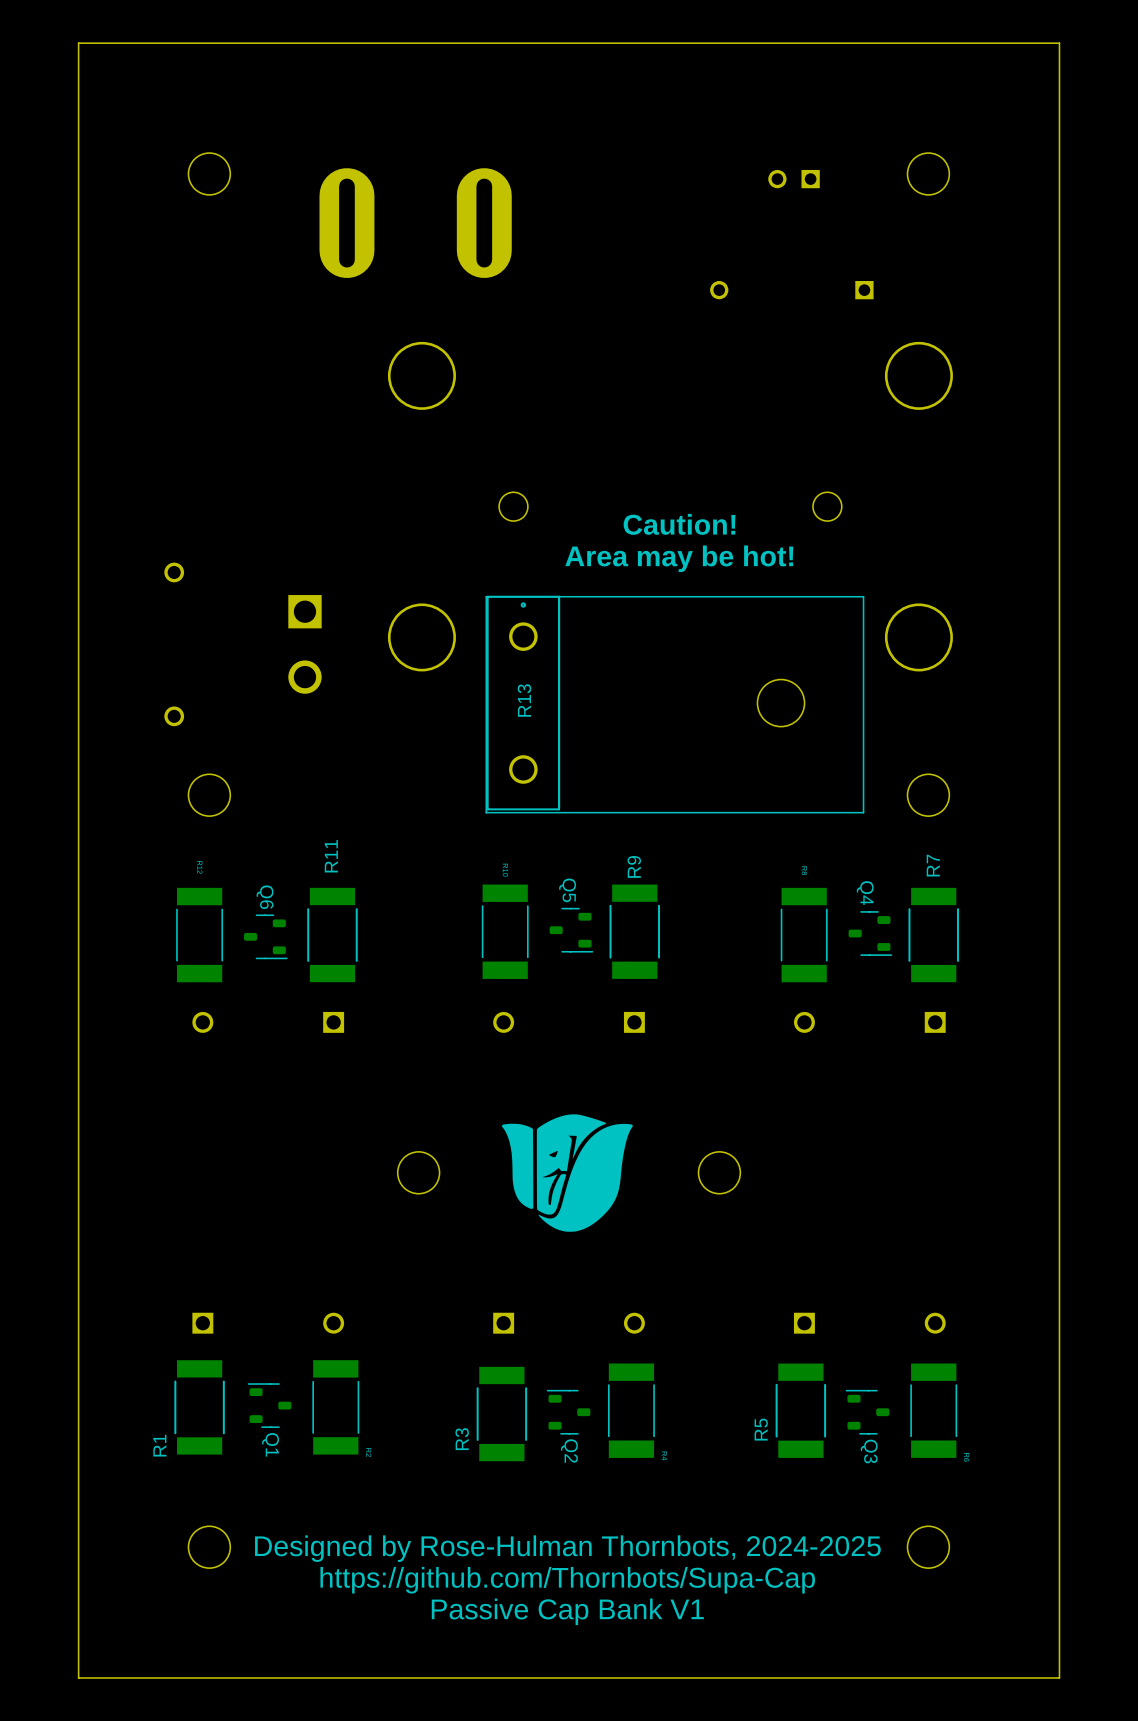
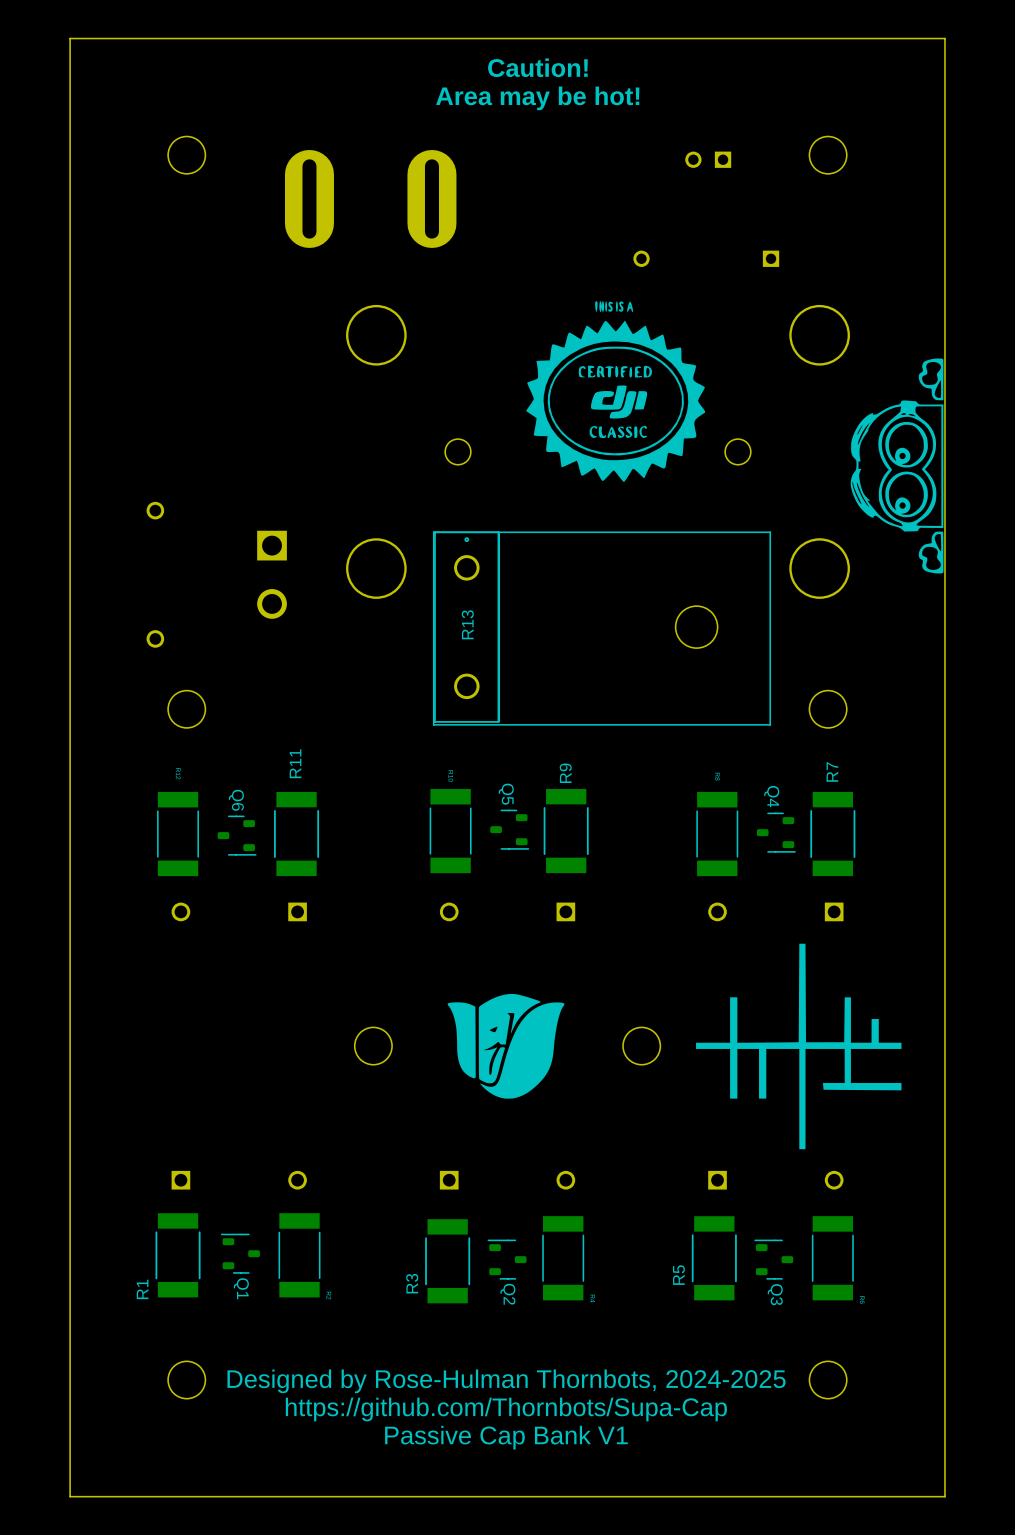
text: none -> Caution! (537, 67)
text: none -> Area may be hot! (537, 98)
drawing: none -> [526, 301, 706, 483]
drawing: none -> [850, 358, 944, 574]
text: Caution! (679, 524) -> none
text: Area may be hot! (679, 558) -> none
drawing: none -> [696, 943, 902, 1150]

